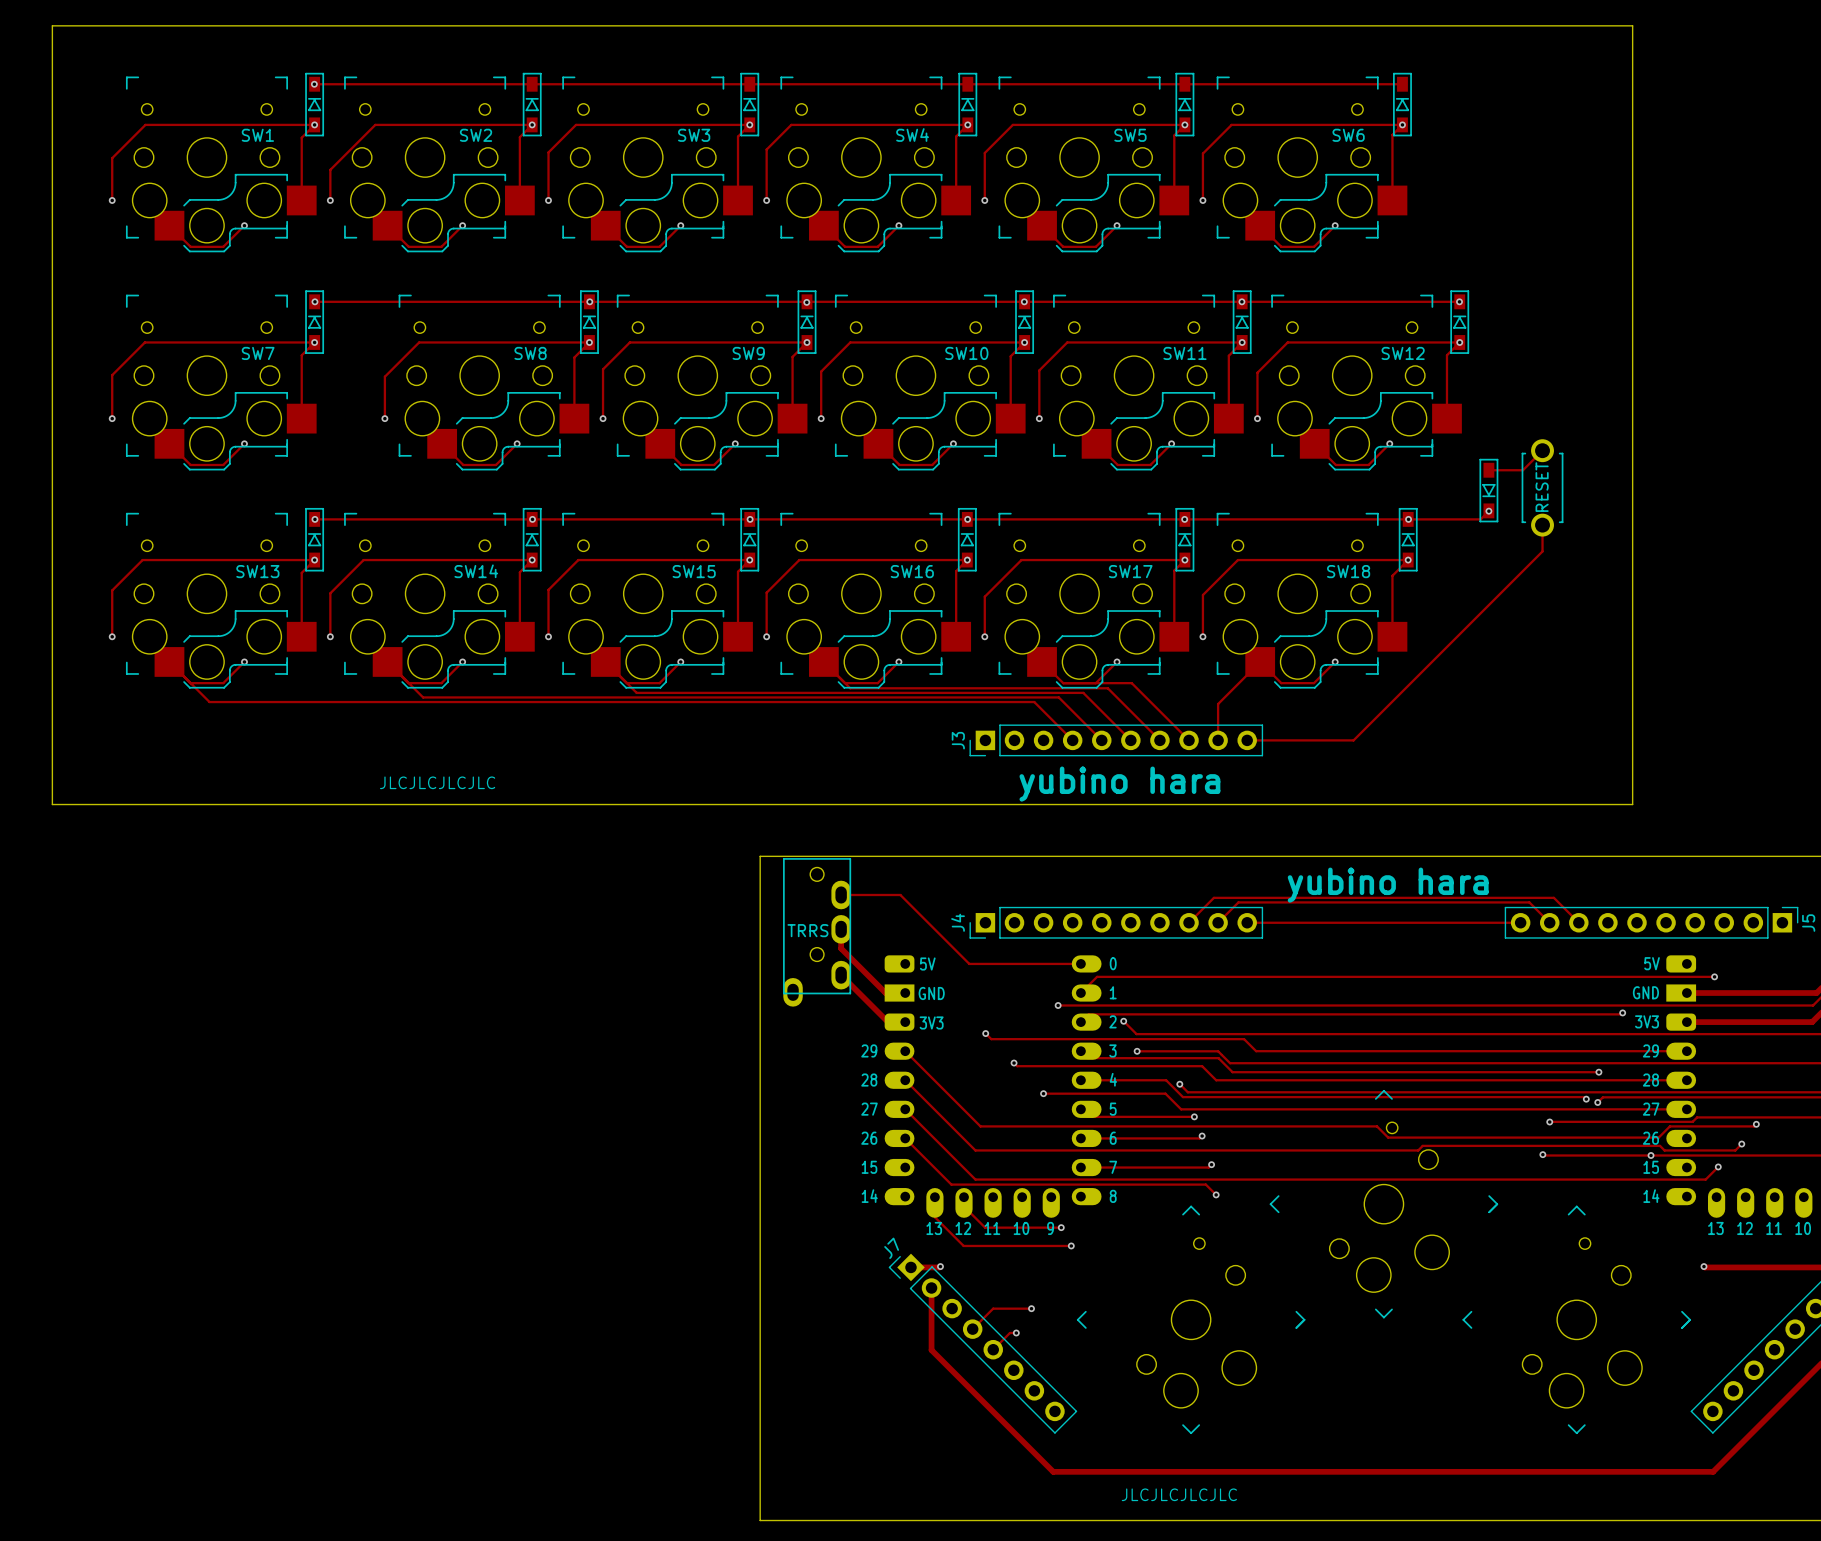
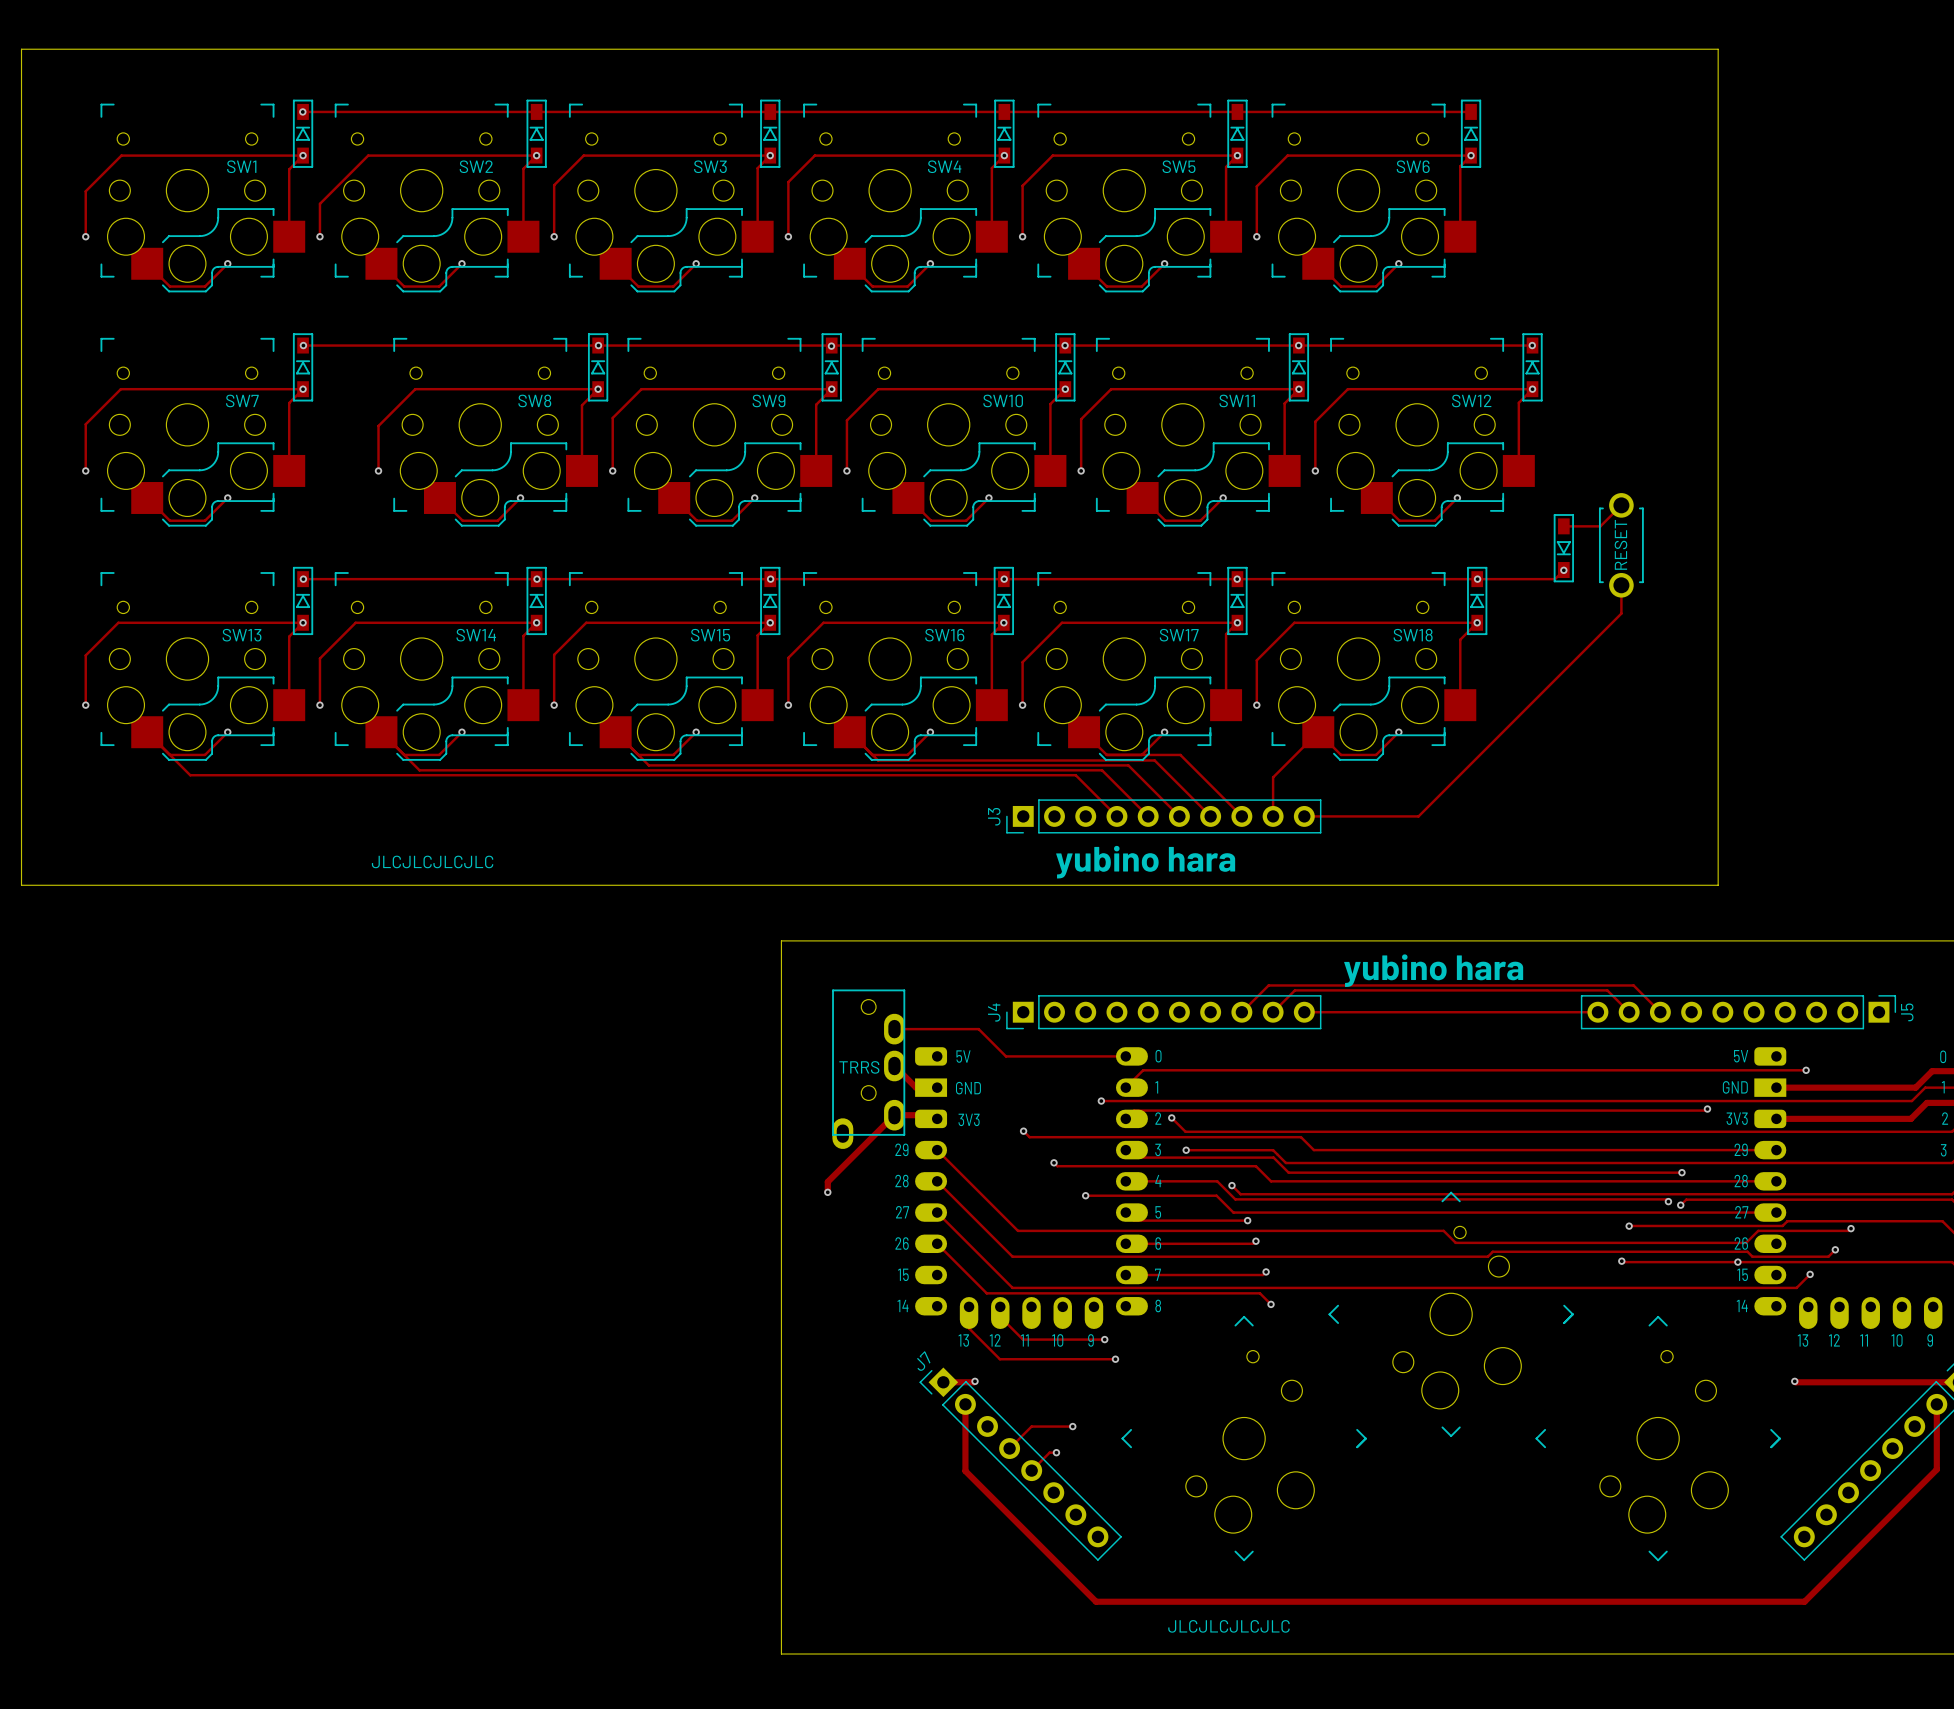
track: (841, 894) (900, 894) (943, 938) -> (894, 1029) (978, 1029)
track: (841, 929) (841, 948) (865, 972) -> none
part position: (817, 932) -> (868, 1069)
track: (841, 975) (888, 1022) (905, 1022) -> none
track: none -> (933, 1115) (894, 1115) (827, 1181) (827, 1192)
via: none -> (827, 1192)

